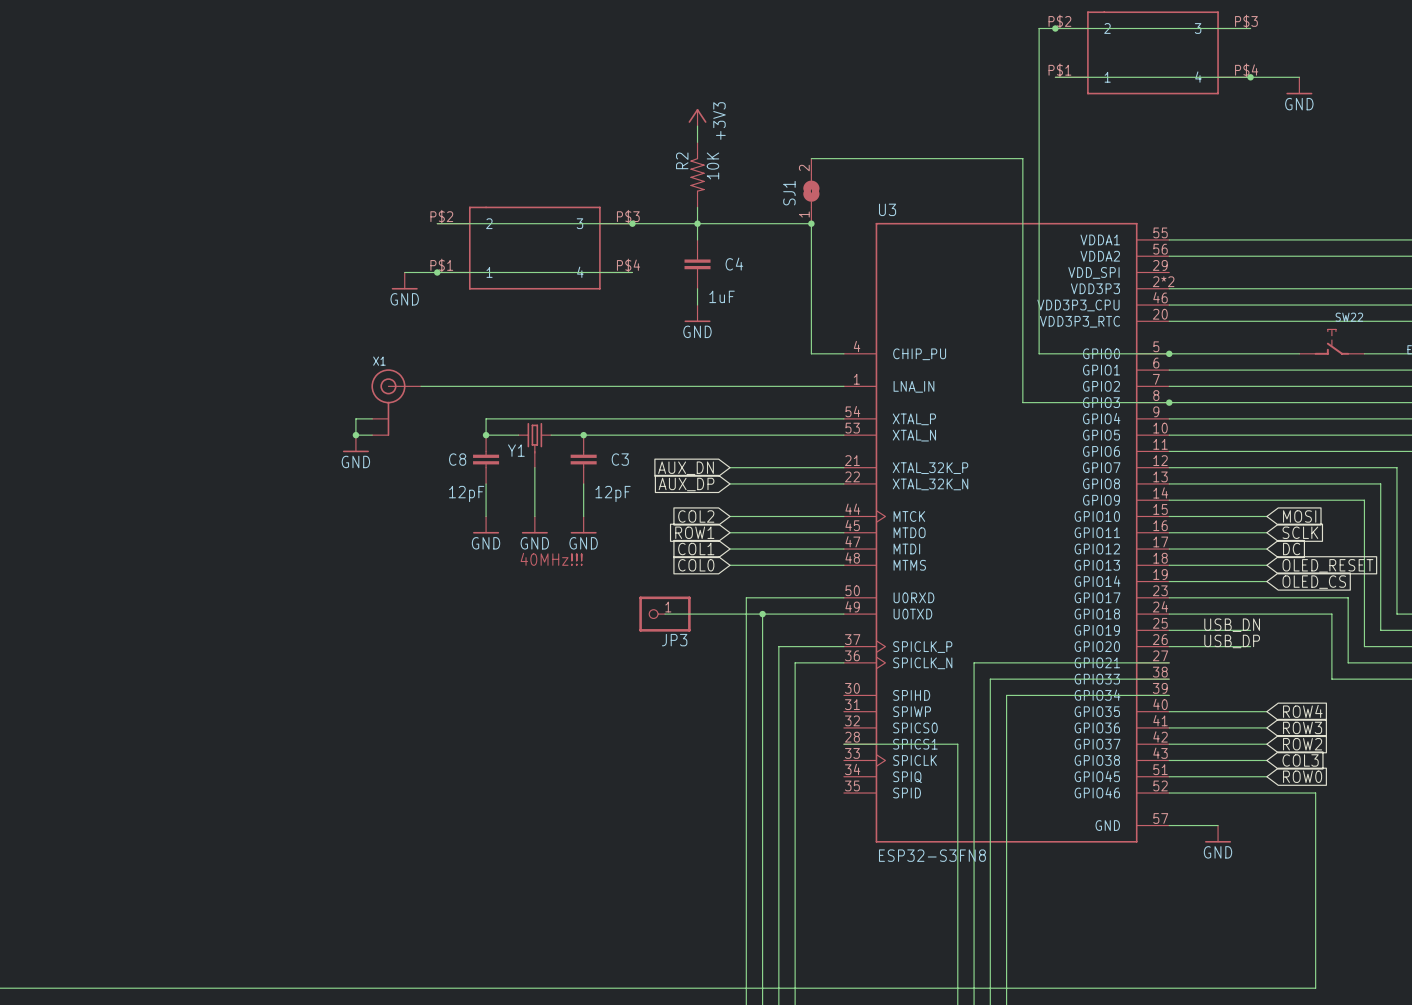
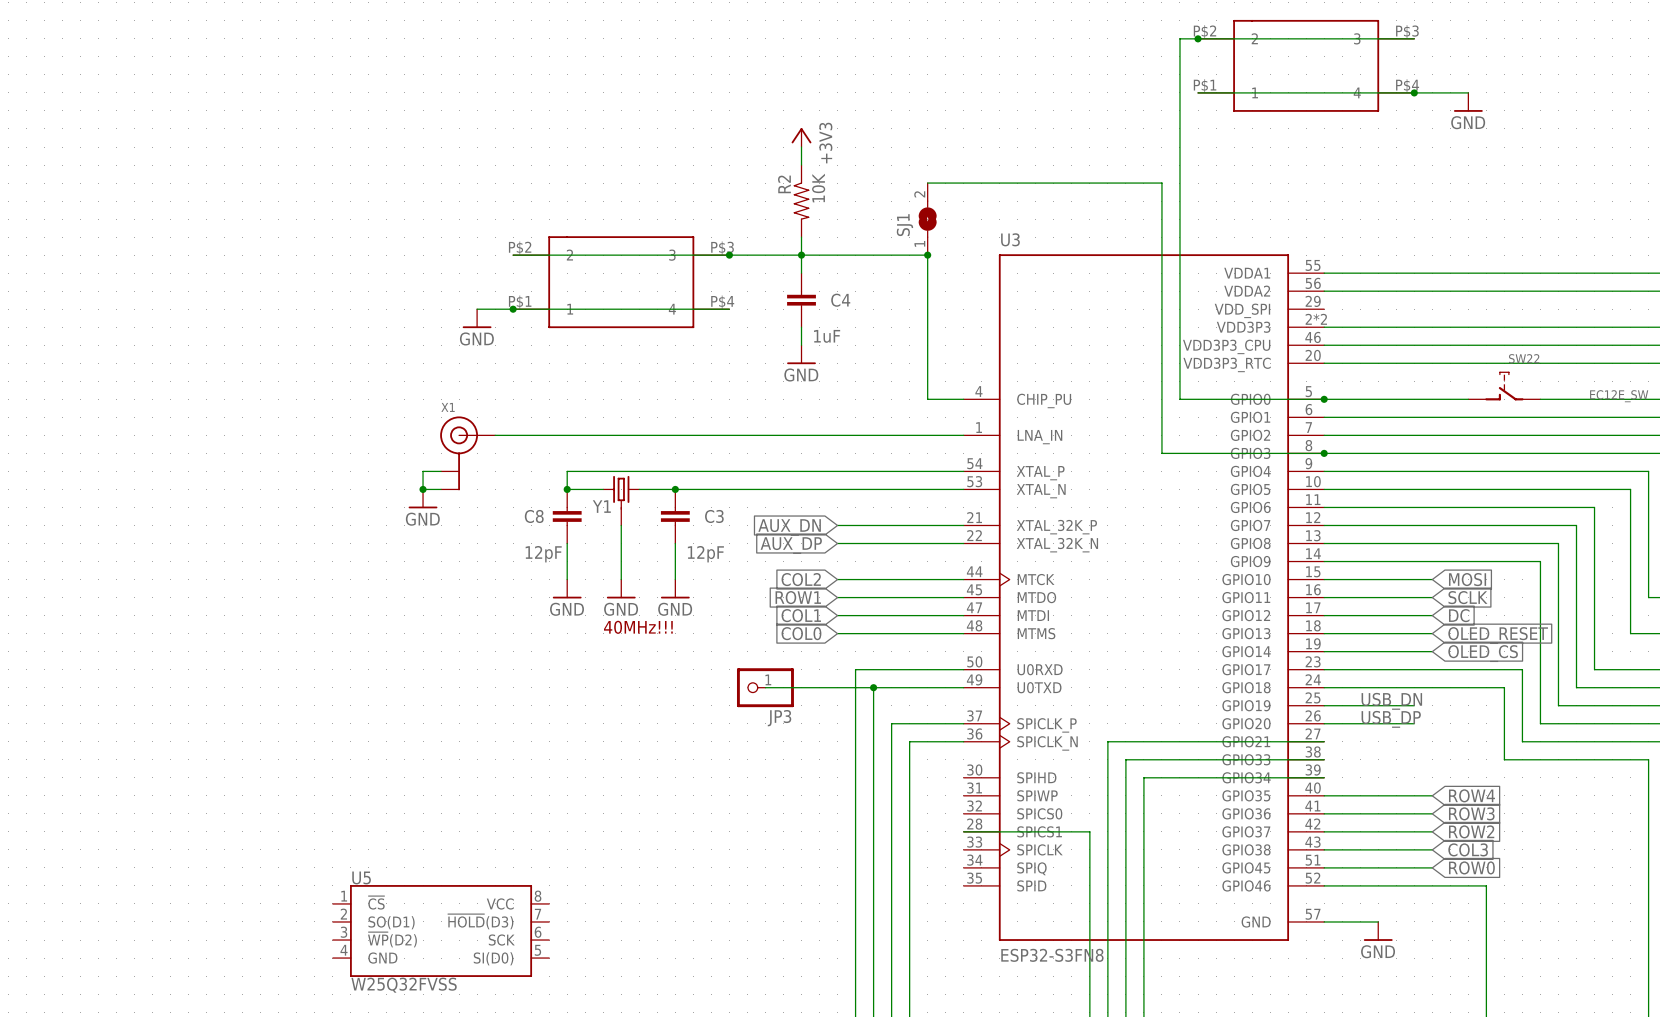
U5: none -> W25Q32FVSS (441, 931)

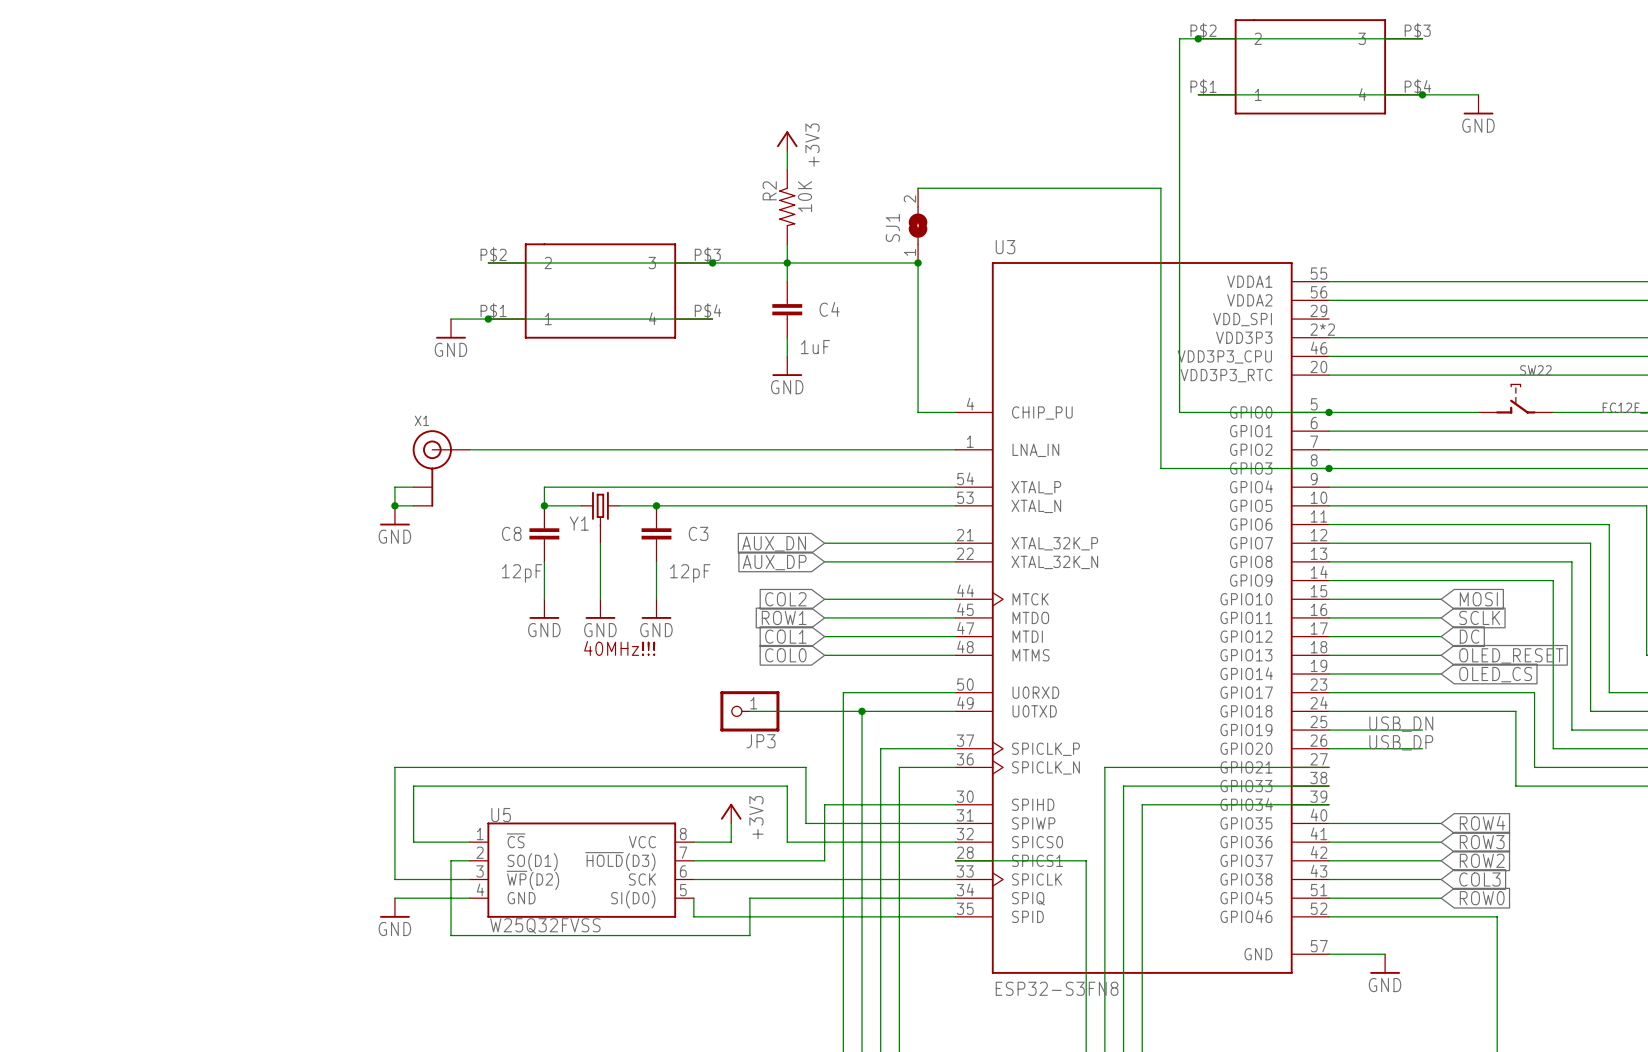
wire: none -> (955, 804) (824, 804) (824, 860) (693, 860)
power symbol: none -> +3V3 (731, 813)
wire: none -> (731, 823) (731, 842) (693, 842)
wire: none -> (955, 823) (805, 823) (805, 767) (394, 767) (394, 879) (469, 879)
wire: none -> (469, 842) (413, 842) (413, 786) (787, 786) (787, 842) (955, 842)
wire: none -> (469, 860) (451, 860) (451, 935) (749, 935) (749, 898) (955, 898)
wire: none -> (693, 879) (955, 879)
wire: none -> (394, 898) (469, 898)
wire: none -> (693, 898) (693, 916) (955, 916)
power symbol: none -> GND (394, 907)
U5 position: (441, 931) -> (581, 870)

